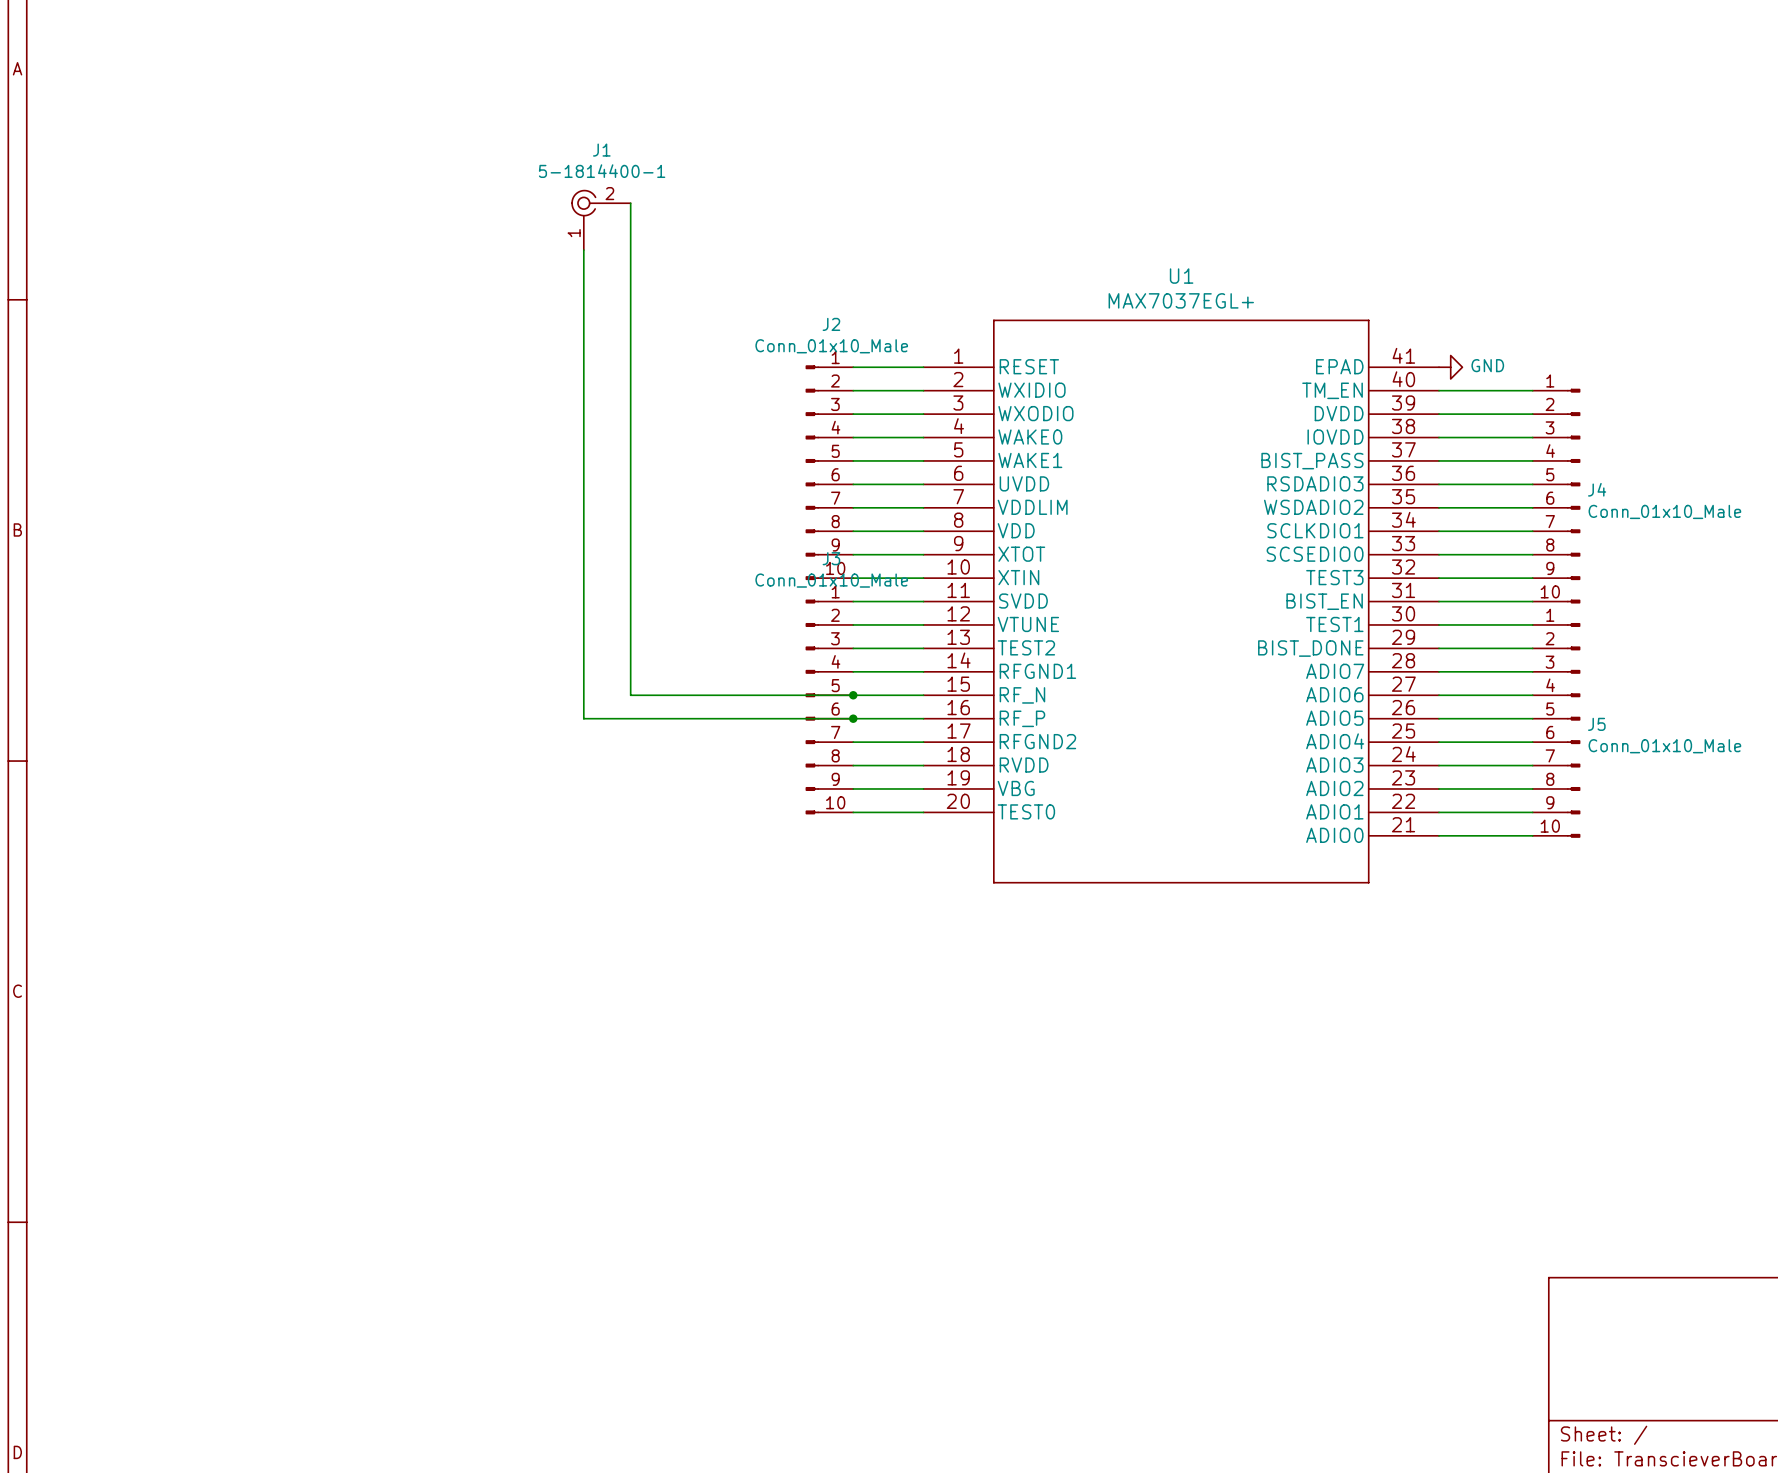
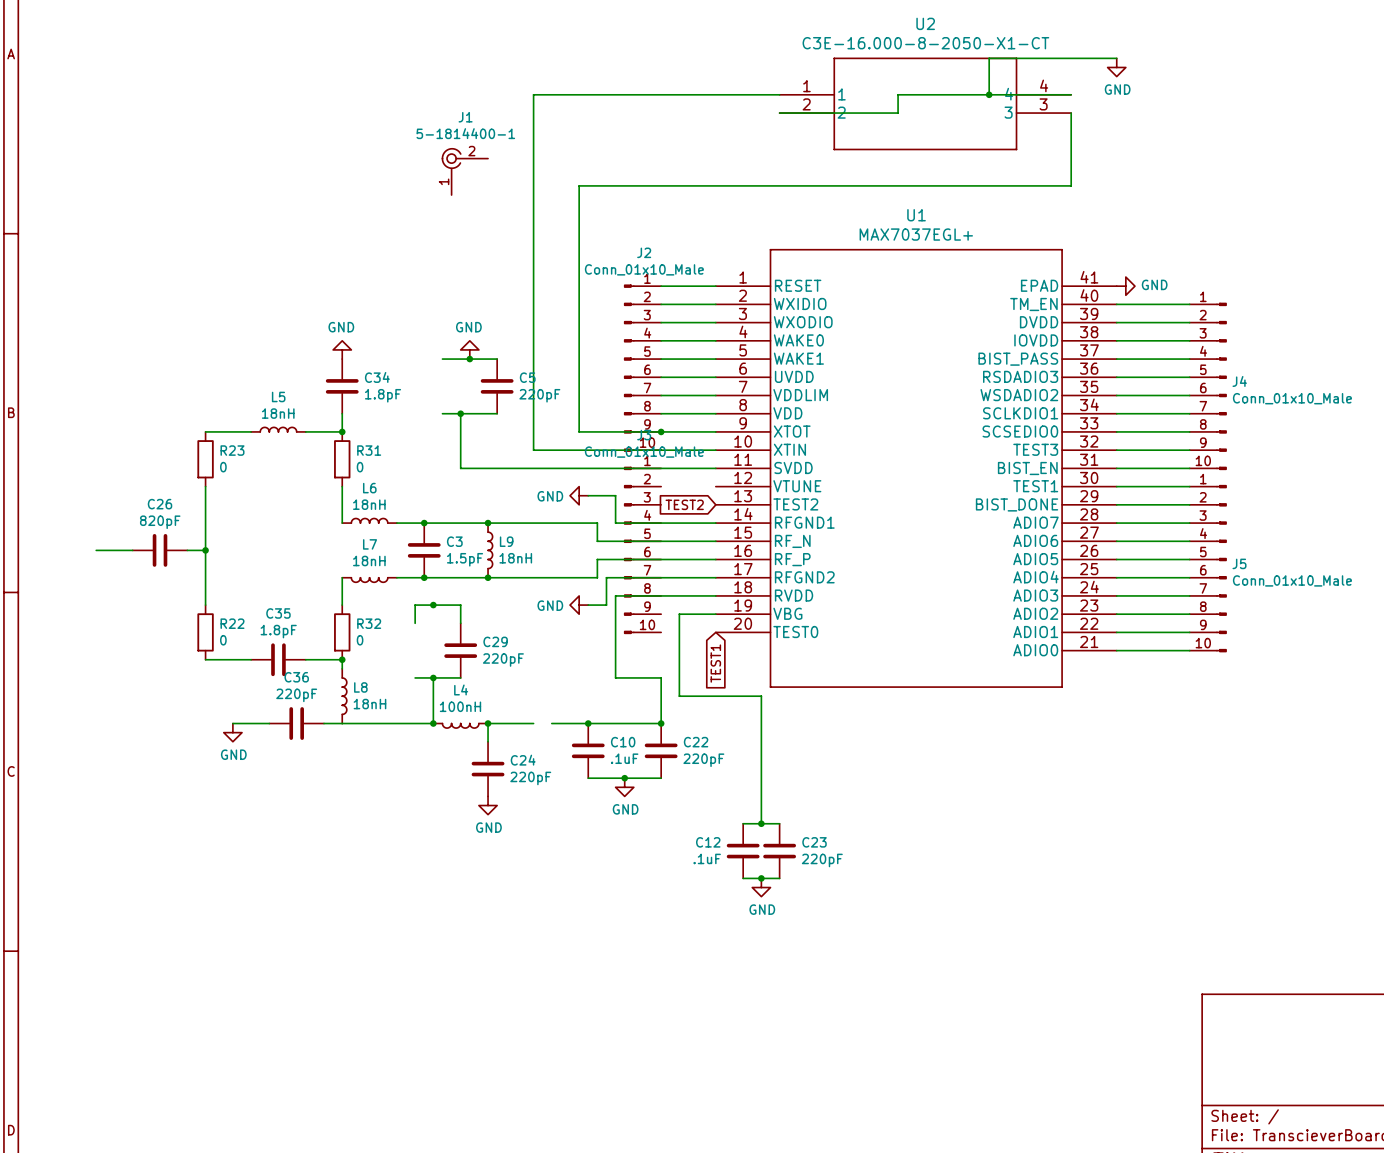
wire: none -> (1116, 58) (989, 58) (989, 94)
power symbol: none -> GND (1116, 67)
wire: none -> (779, 94) (533, 94) (533, 450) (661, 450)
junction: none -> (989, 94)
wire: none -> (1071, 94) (898, 94) (898, 113) (779, 113)
U2: none -> C3E-16.000-8-2050-X1-CT (925, 103)
wire: none -> (1071, 113) (1071, 185) (579, 185) (579, 431) (661, 431)
wire: (630, 203) (630, 695) (771, 695) -> (396, 523) (597, 523) (597, 541)
wire: (583, 250) (583, 718) (771, 718) -> (396, 577) (597, 577) (597, 559)
power symbol: none -> GND (342, 349)
power symbol: none -> GND (469, 349)
wire: none -> (442, 359) (497, 359)
junction: none -> (469, 359)
C34: none -> 1.8pF (342, 386)
C5: none -> 220pF (497, 386)
wire: none -> (342, 413) (342, 431) (305, 431)
wire: none -> (442, 413) (497, 413)
wire: none -> (460, 413) (460, 468) (661, 468)
junction: none -> (460, 413)
L5: none -> 18nH (278, 429)
wire: none -> (205, 431) (251, 431)
junction: none -> (342, 431)
junction: none -> (661, 431)
R23: none -> 0 (205, 459)
R31: none -> 0 (342, 459)
wire: none -> (205, 486) (205, 605)
wire: none -> (342, 486) (342, 523)
wire: (853, 624) (923, 624) -> none
power symbol: none -> GND (579, 495)
wire: none -> (588, 495) (615, 495) (615, 523) (661, 523)
wire: (853, 648) (923, 648) -> none
global label: none -> TEST2 (684, 504)
L6: none -> 18nH (369, 520)
junction: none -> (424, 523)
junction: none -> (488, 523)
junction: (853, 695) -> none
wire: none -> (96, 550) (132, 550)
C26: none -> 820pF (160, 550)
wire: none -> (187, 550) (205, 550)
junction: none -> (205, 550)
C3: none -> 1.5pF (424, 550)
L9: none -> 18nH (490, 550)
junction: (853, 718) -> none
wire: none -> (342, 577) (342, 605)
junction: none -> (424, 577)
junction: none -> (488, 577)
wire: none -> (661, 577) (606, 577) (606, 605) (588, 605)
L7: none -> 18nH (369, 580)
wire: none -> (661, 595) (615, 595) (615, 677) (661, 677) (661, 723) (551, 723)
junction: none -> (433, 605)
power symbol: none -> GND (579, 605)
wire: (853, 788) (876, 788) -> (761, 823) (761, 696) (679, 696) (679, 614)
wire: none -> (415, 623) (415, 605) (460, 605) (460, 623)
R22: none -> 0 (205, 632)
R32: none -> 0 (342, 632)
wire: (853, 812) (923, 812) -> none
C29: none -> 220pF (460, 650)
wire: none -> (205, 659) (251, 659)
C35: none -> 1.8pF (278, 659)
wire: none -> (305, 659) (342, 659) (342, 668)
junction: none -> (342, 659)
global label: none -> TEST1 (715, 663)
wire: none -> (415, 677) (460, 677)
wire: none -> (433, 677) (433, 723) (324, 723)
junction: none -> (433, 677)
L8: none -> 18nH (344, 696)
wire: none -> (232, 723) (269, 723)
C36: none -> 220pF (296, 723)
junction: none -> (433, 723)
junction: none -> (488, 723)
wire: none -> (533, 723) (488, 723) (488, 741)
junction: none -> (588, 723)
junction: none -> (661, 723)
L4: none -> 100nH (460, 725)
power symbol: none -> GND (232, 732)
C10: none -> .1uF (588, 750)
C22: none -> 220pF (661, 750)
C24: none -> 220pF (488, 769)
wire: none -> (588, 778) (661, 778)
junction: none -> (624, 778)
power symbol: none -> GND (624, 787)
power symbol: none -> GND (488, 805)
wire: none -> (743, 823) (779, 823)
junction: none -> (761, 823)
C12: none -> .1uF (743, 851)
C23: none -> 220pF (779, 851)
wire: none -> (743, 878) (779, 878)
junction: none -> (761, 878)
power symbol: none -> GND (761, 887)

